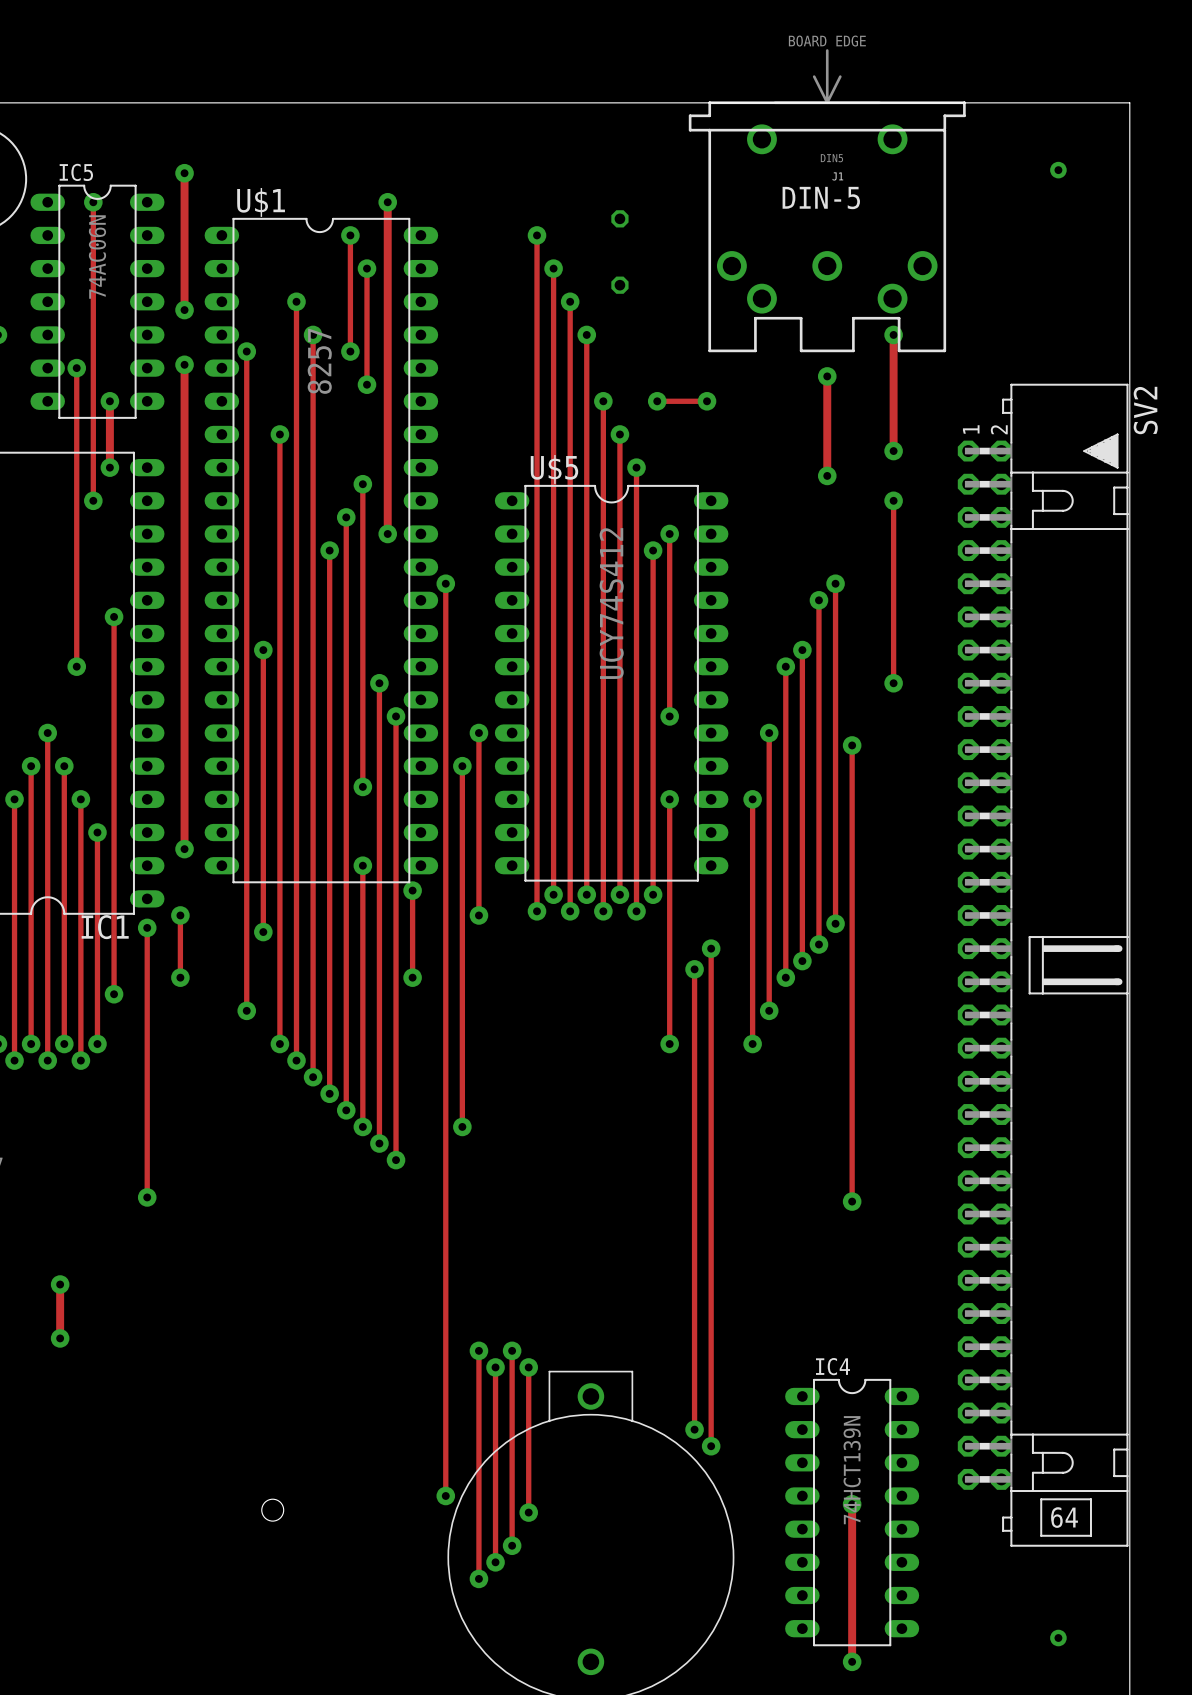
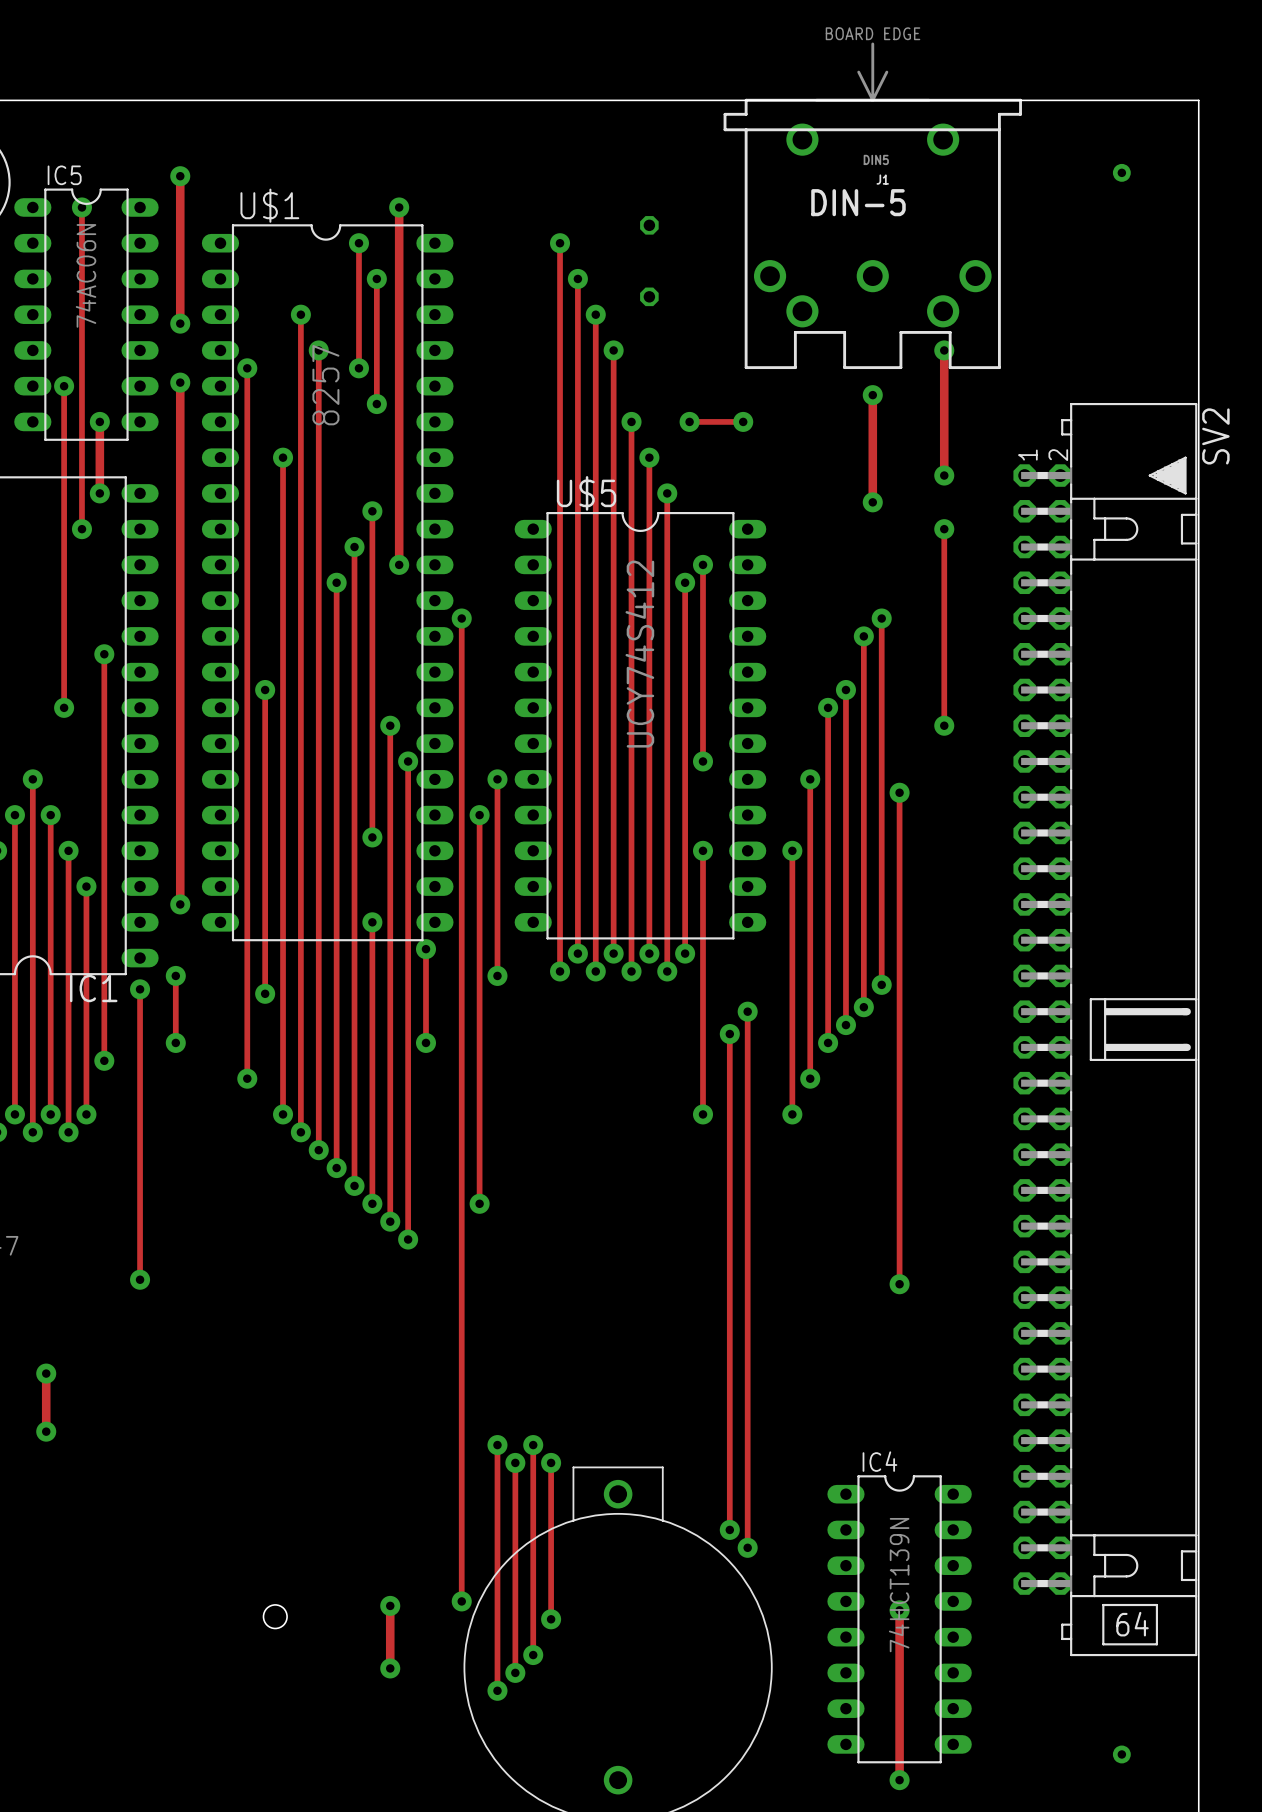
track: none -> (390, 1605) (390, 1668)
via: none -> (390, 1605)
via: none -> (390, 1668)

